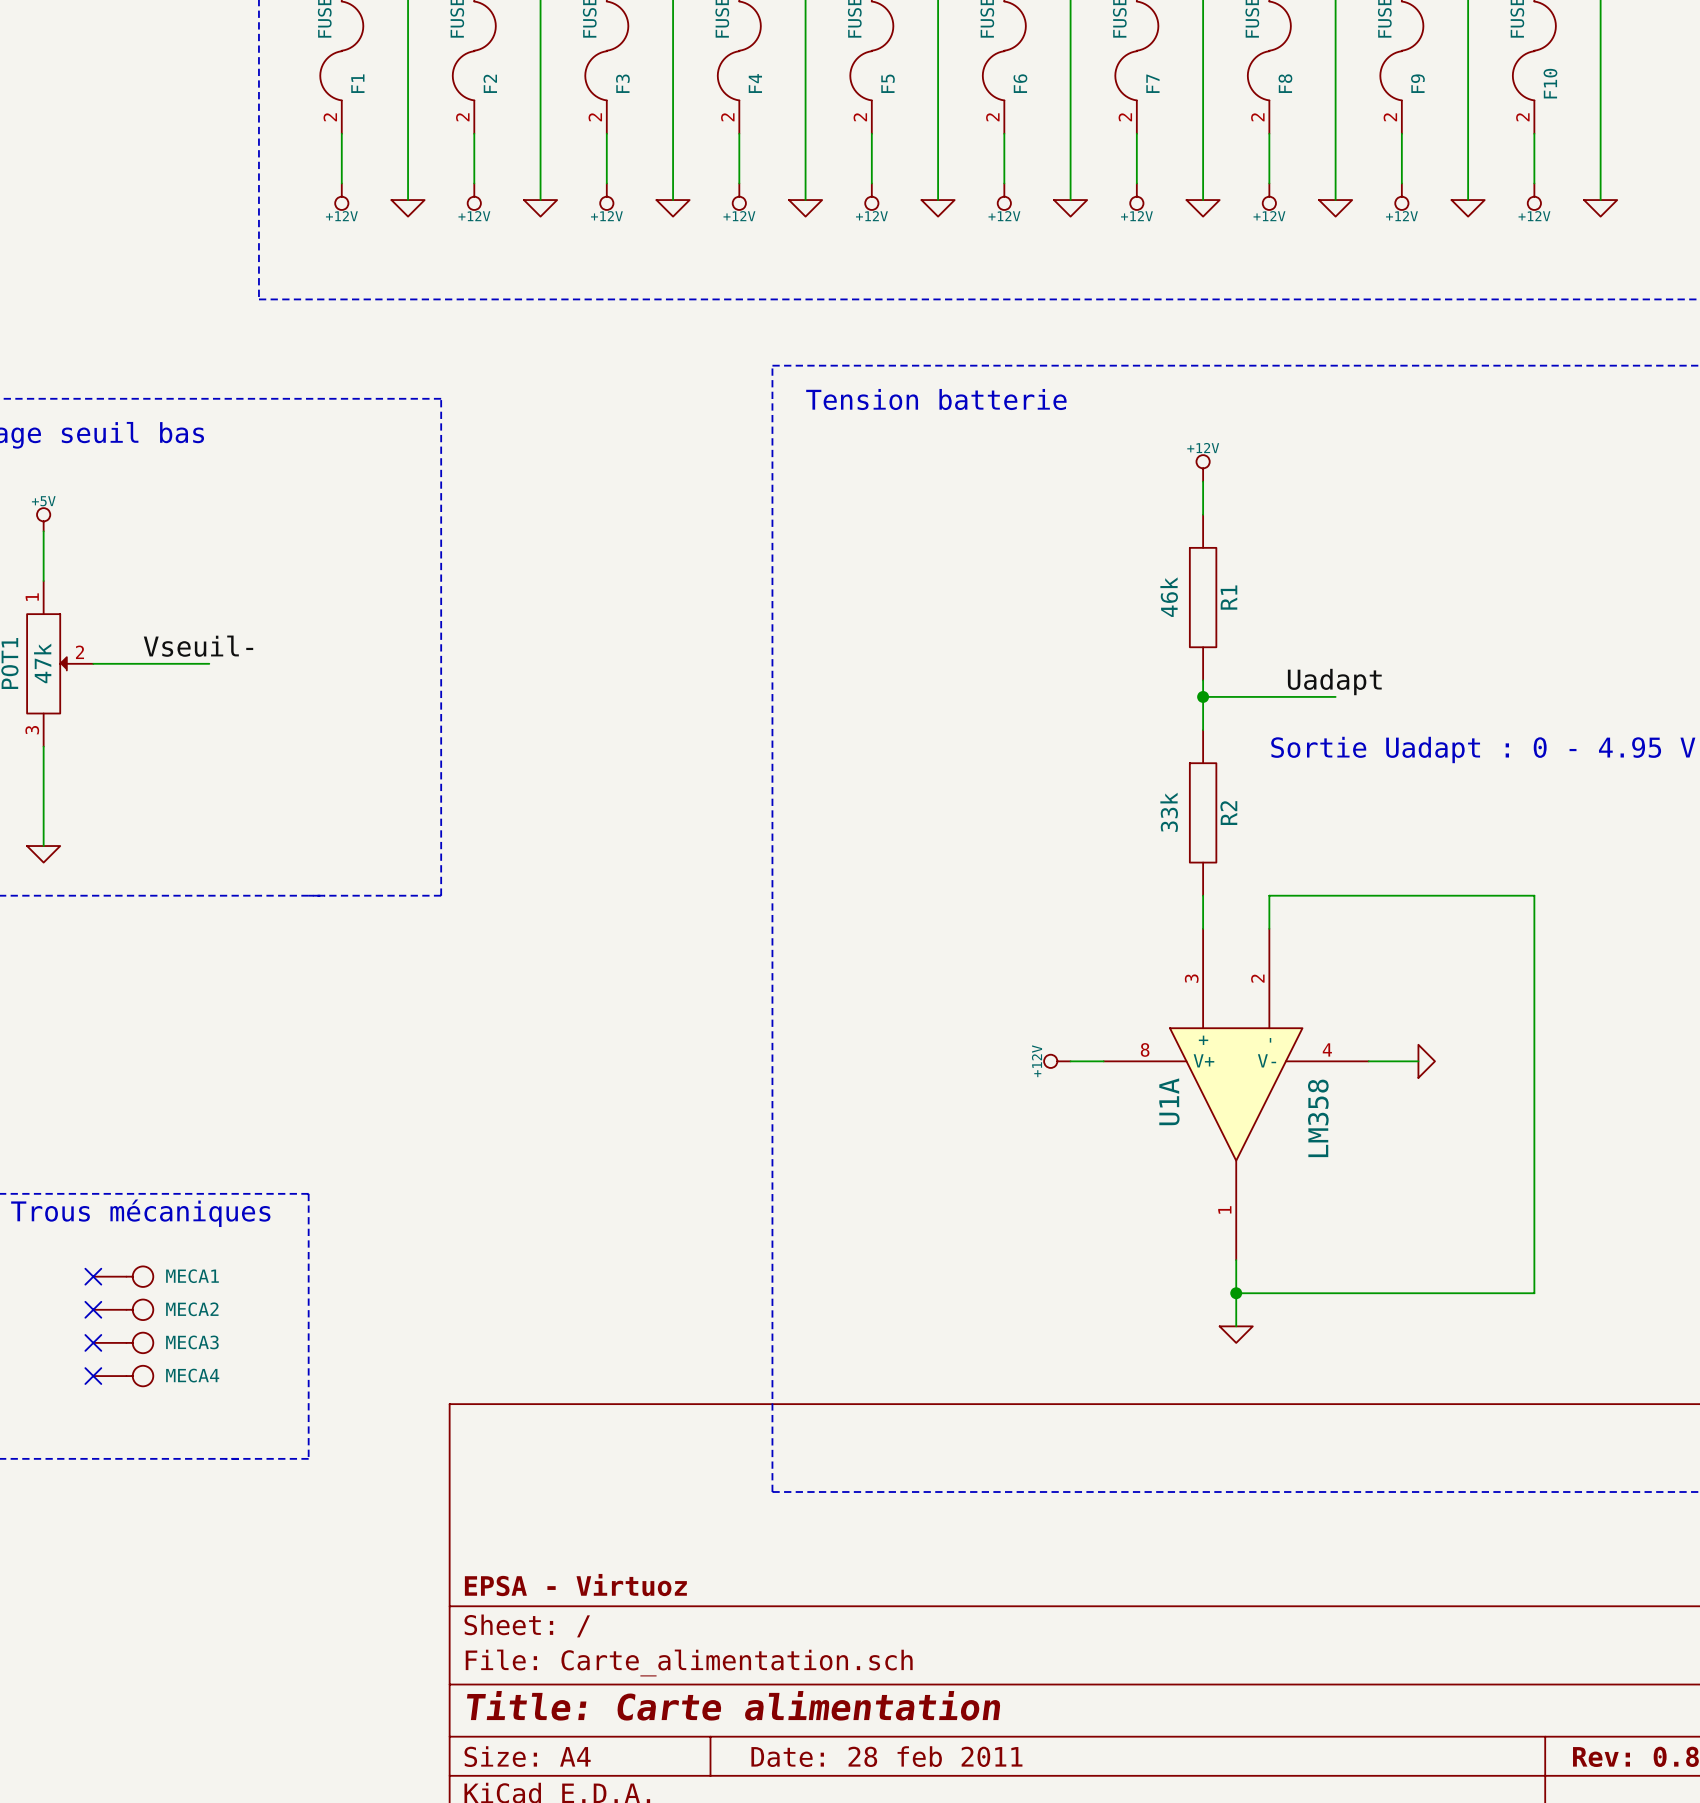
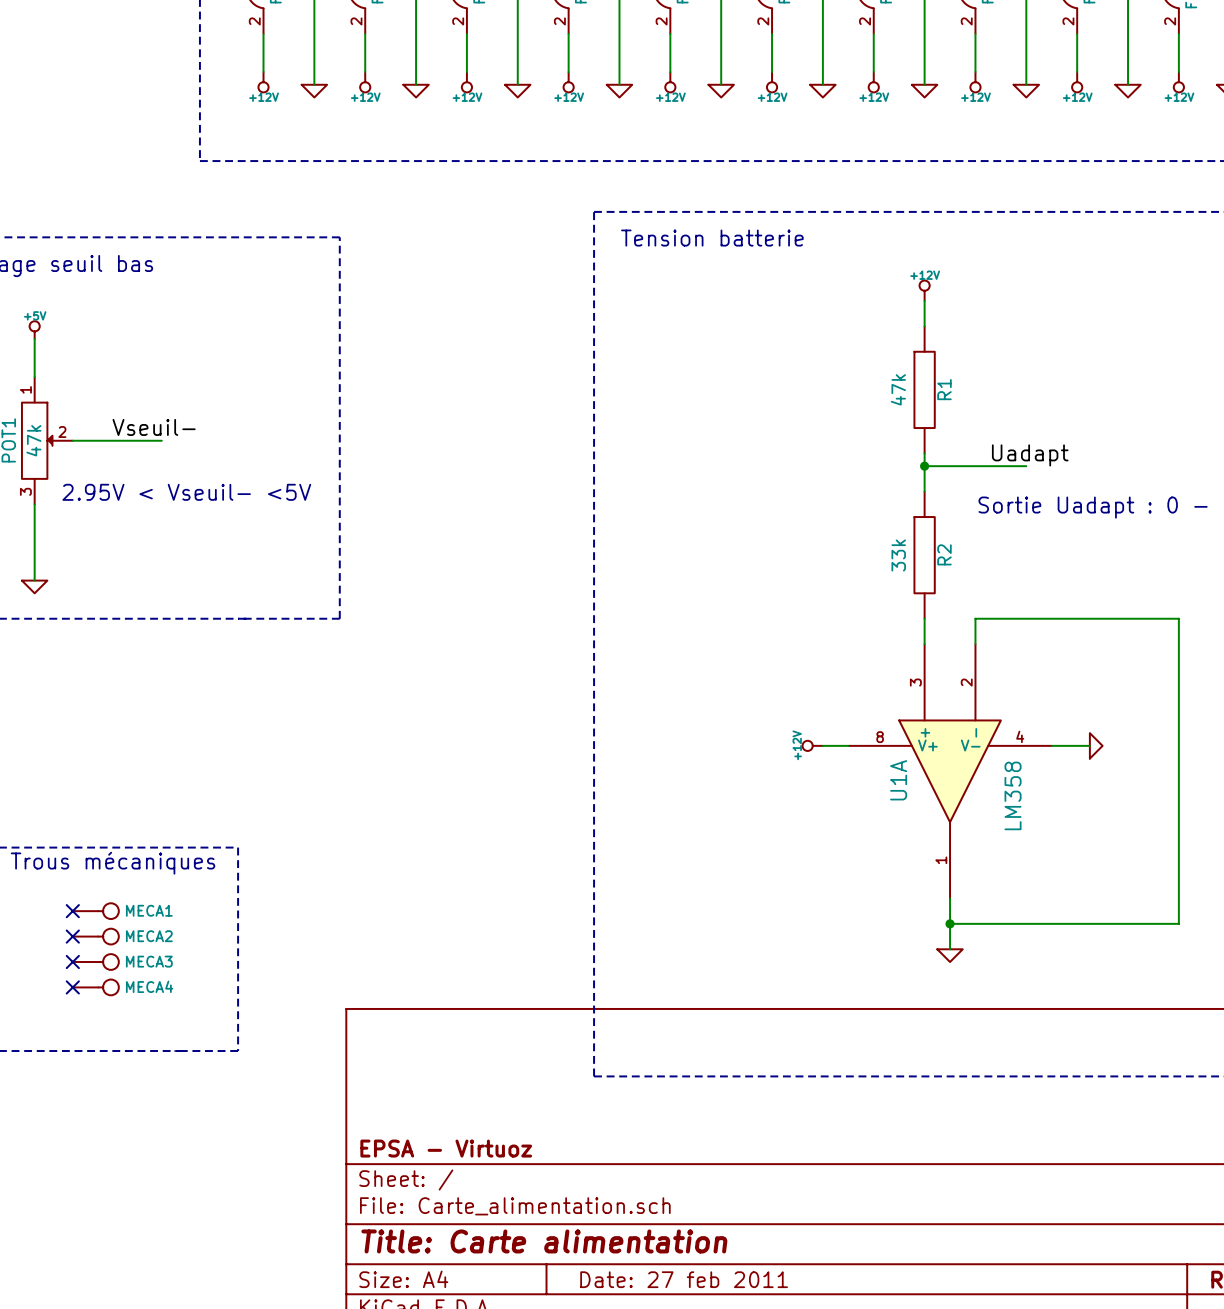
R1 value: 46k (1169, 597) -> 47k (898, 389)
text: none -> 2.95V < Vseuil- <5V (186, 492)
title block: Date: 28 feb 2011 (886, 1756) -> Date: 27 feb 2011 (684, 1279)

